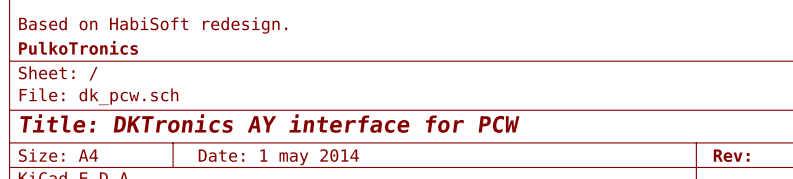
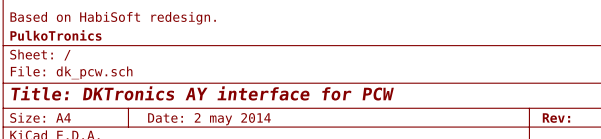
title block: Date: 1 may 2014 (278, 157) -> Date: 2 may 2014 (209, 119)

